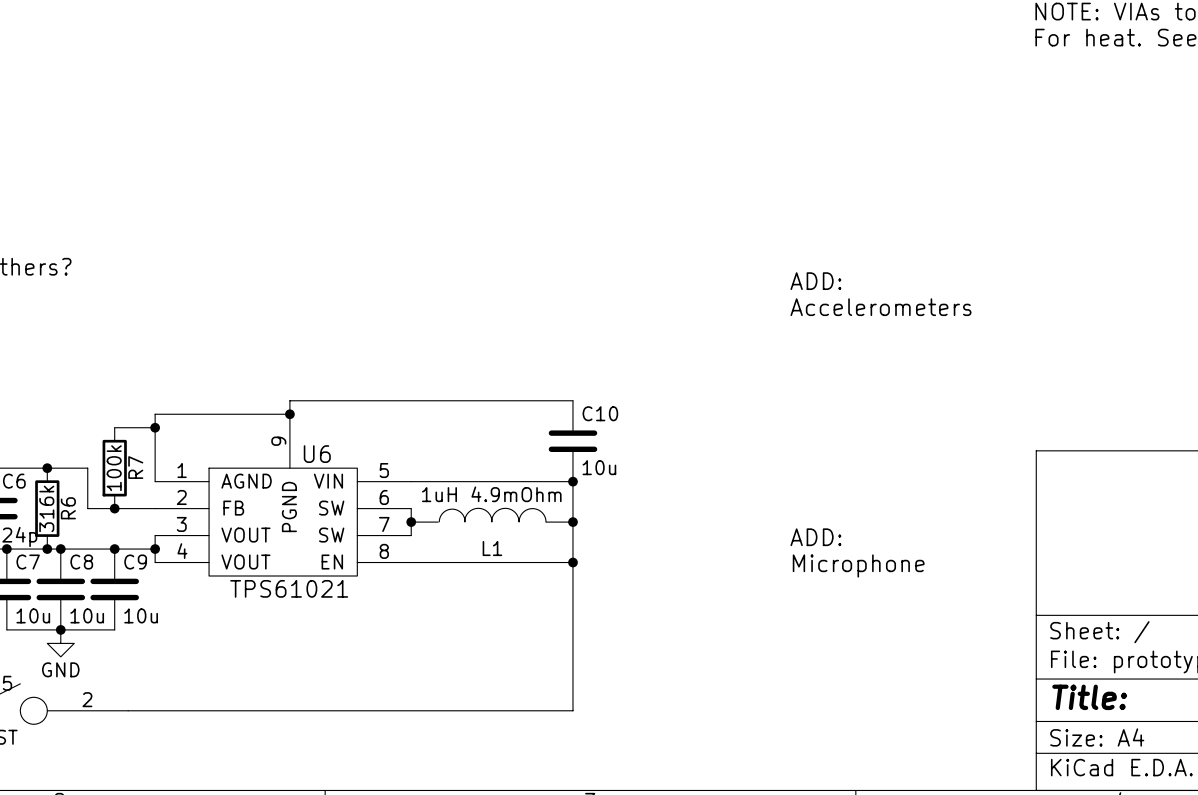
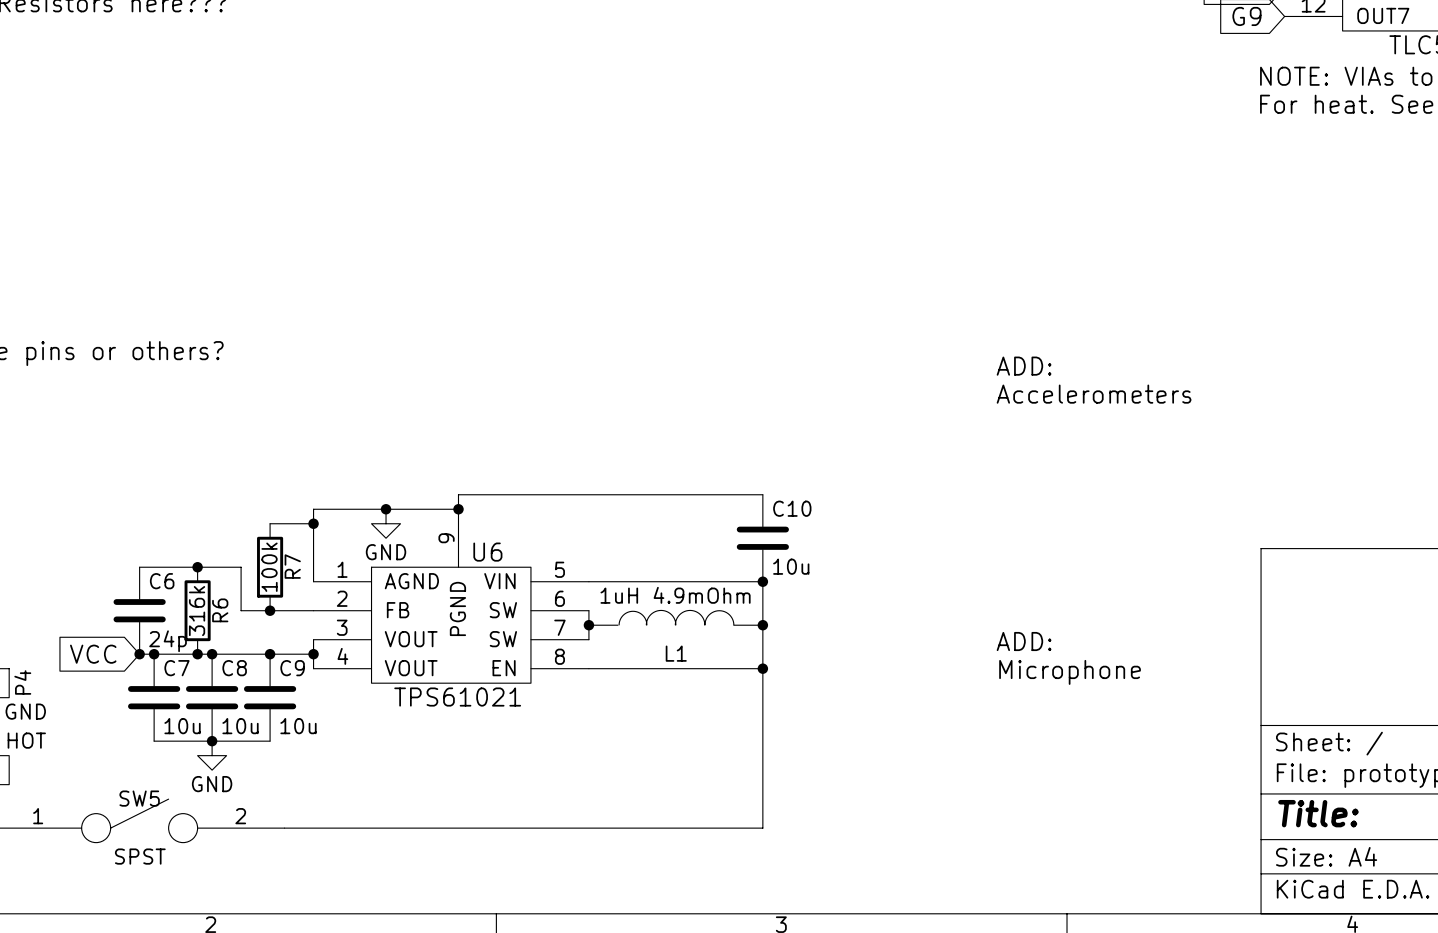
junction: none -> (386, 509)
power symbol: none -> GND (386, 523)

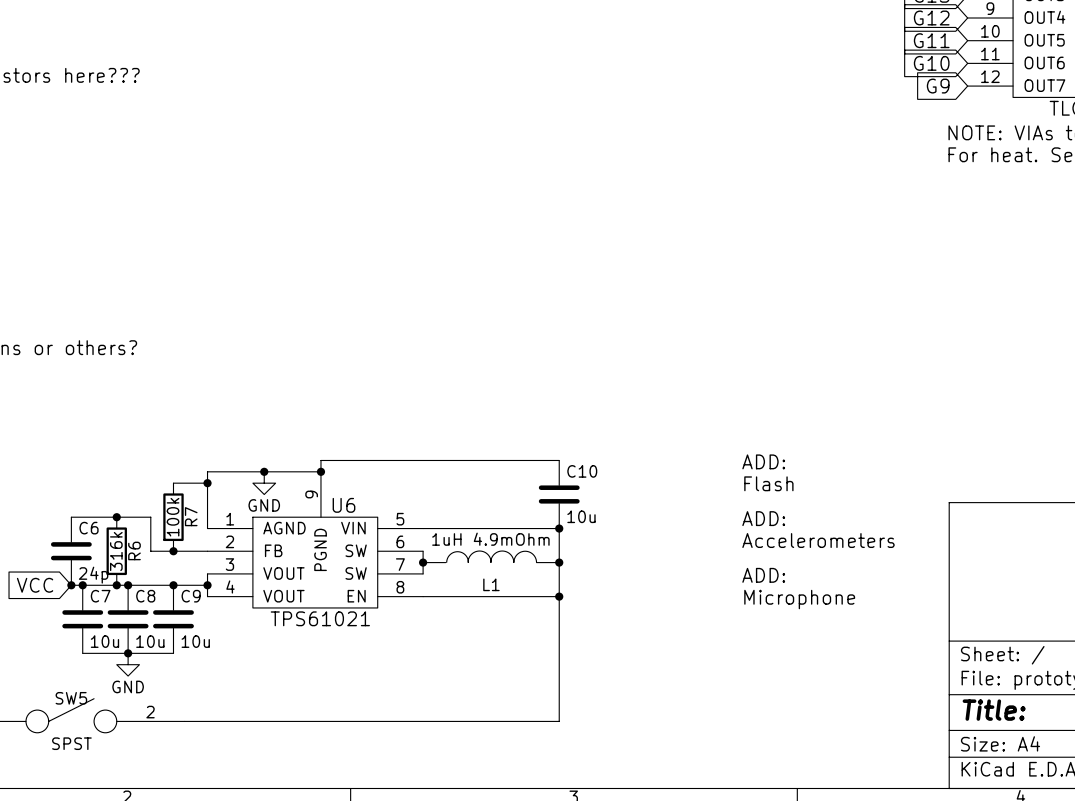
text: ADD: (1024, 366) -> none
text position: Accelerometers (1094, 394) -> Accelerometers (818, 540)
text: none -> ADD: (763, 461)
text: none -> Flash (768, 483)
text: none -> ADD: (763, 518)

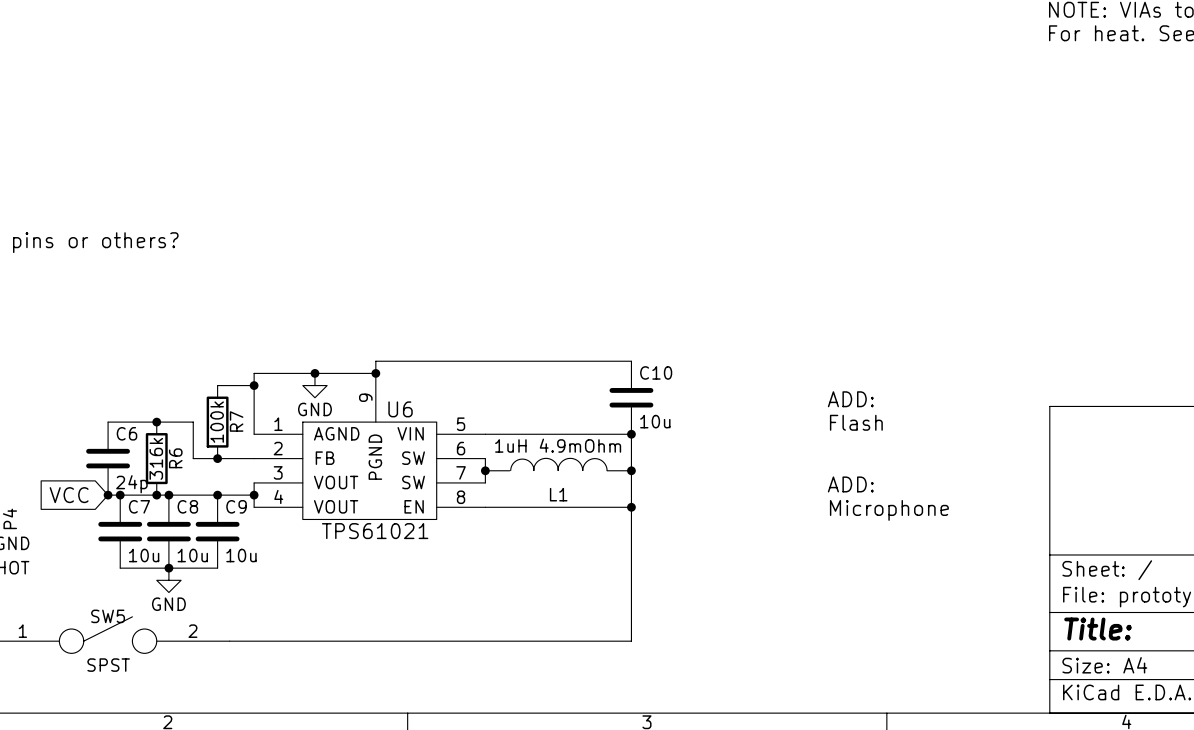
text position: ADD: (763, 461) -> ADD: (850, 399)
text: Flash (768, 483) -> none
text: ADD: (763, 518) -> Flash (856, 422)
text: Accelerometers (818, 540) -> none

